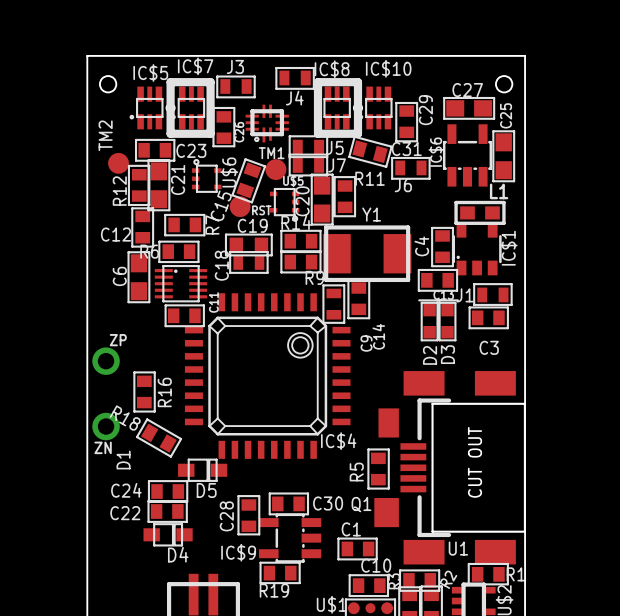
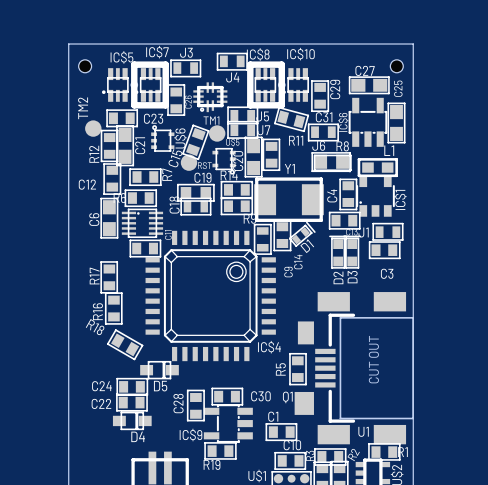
line: none -> (314, 155) (314, 170) (351, 169)
line: none -> (314, 155) (350, 155) (350, 169)
R8: none -> (331, 162)
R17: none -> (109, 277)
ZP: (106, 361) -> none
R16 name position: R16 (164, 392) -> R16 (97, 311)
ZN: (106, 426) -> none
D1 footprint: [116, 450, 131, 470] -> [289, 221, 316, 247]

